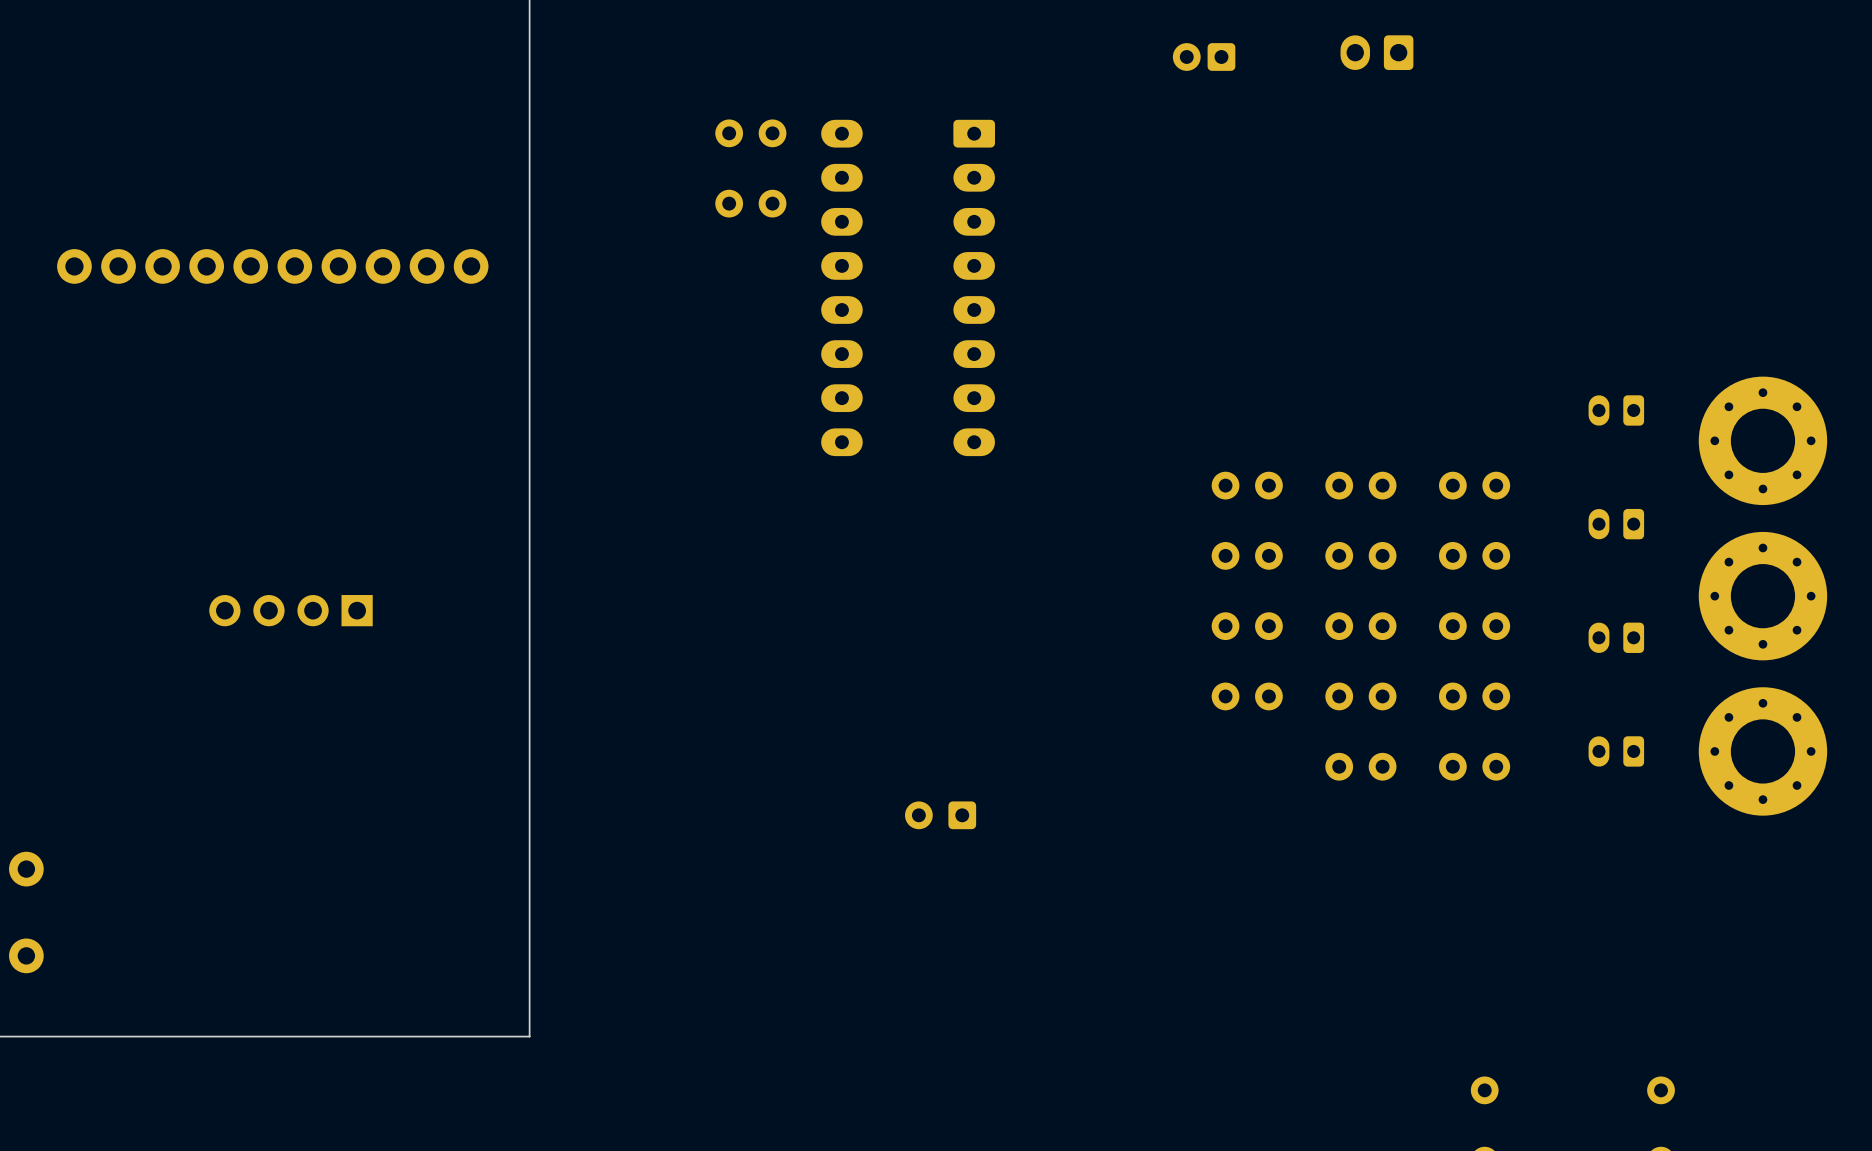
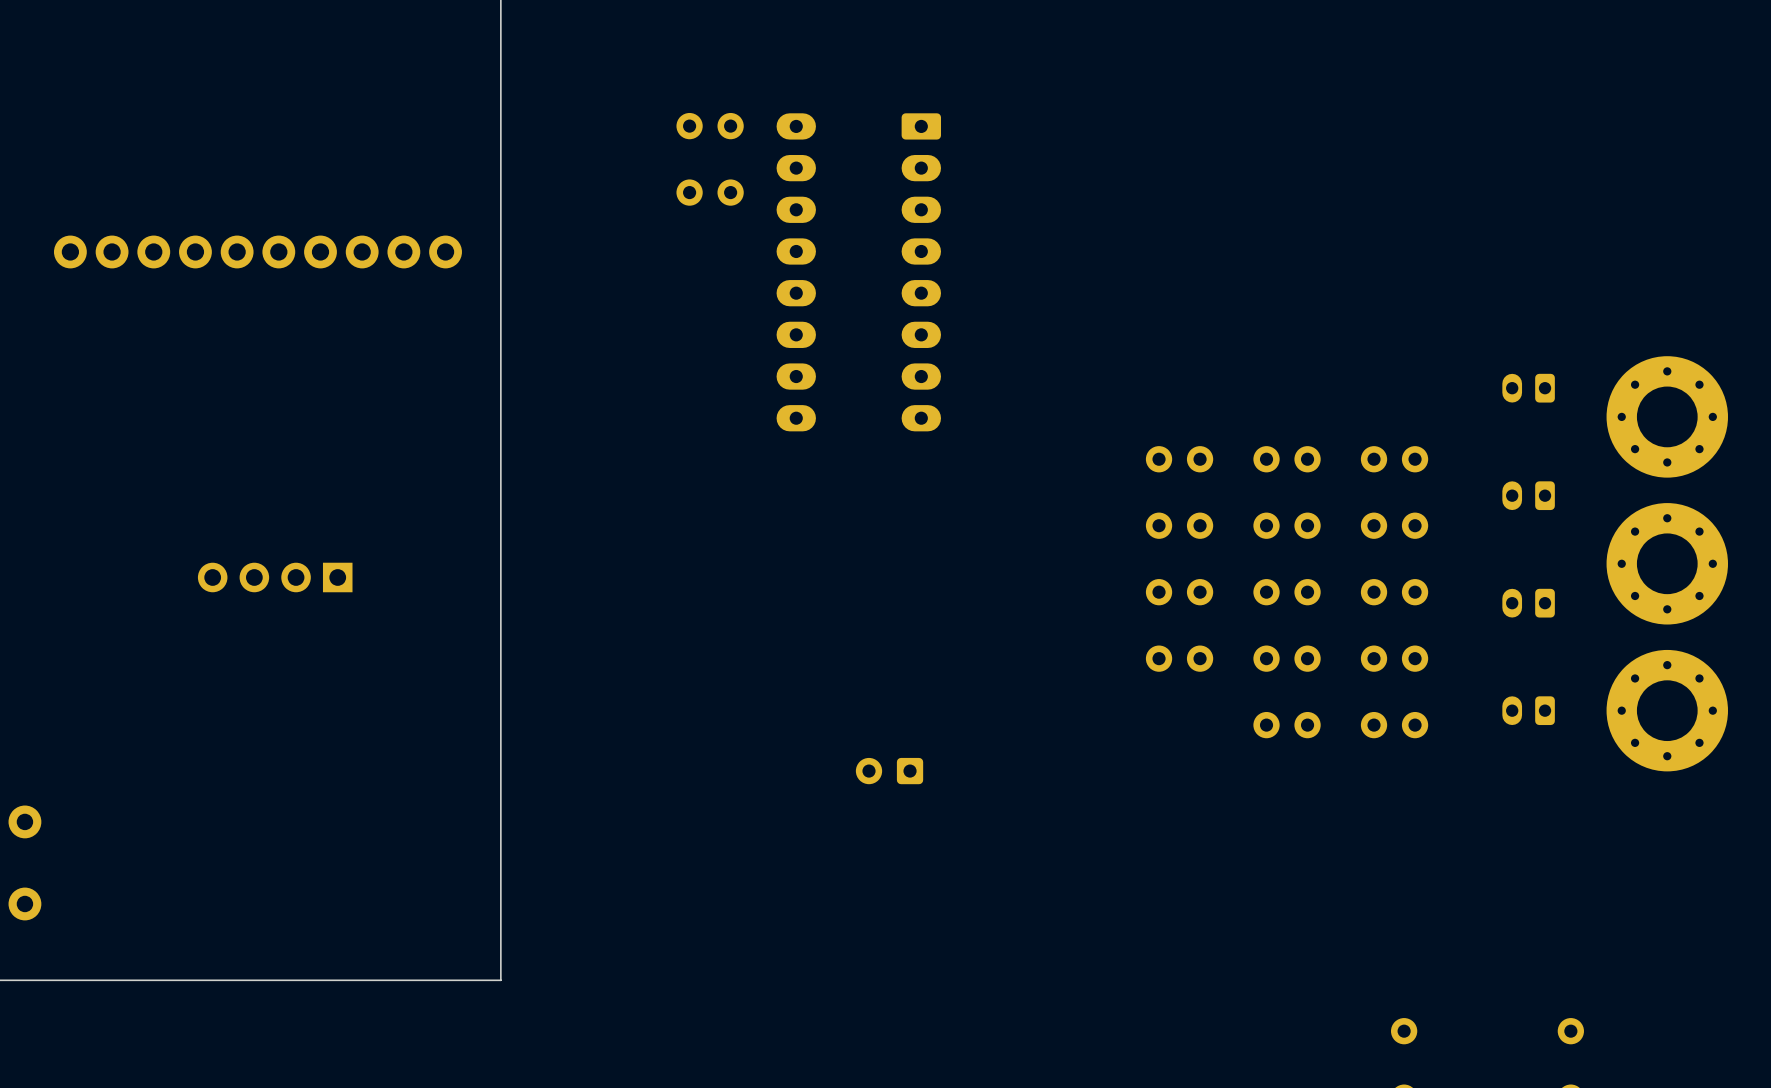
part: (1376, 52) -> none
part: (1204, 56) -> none

